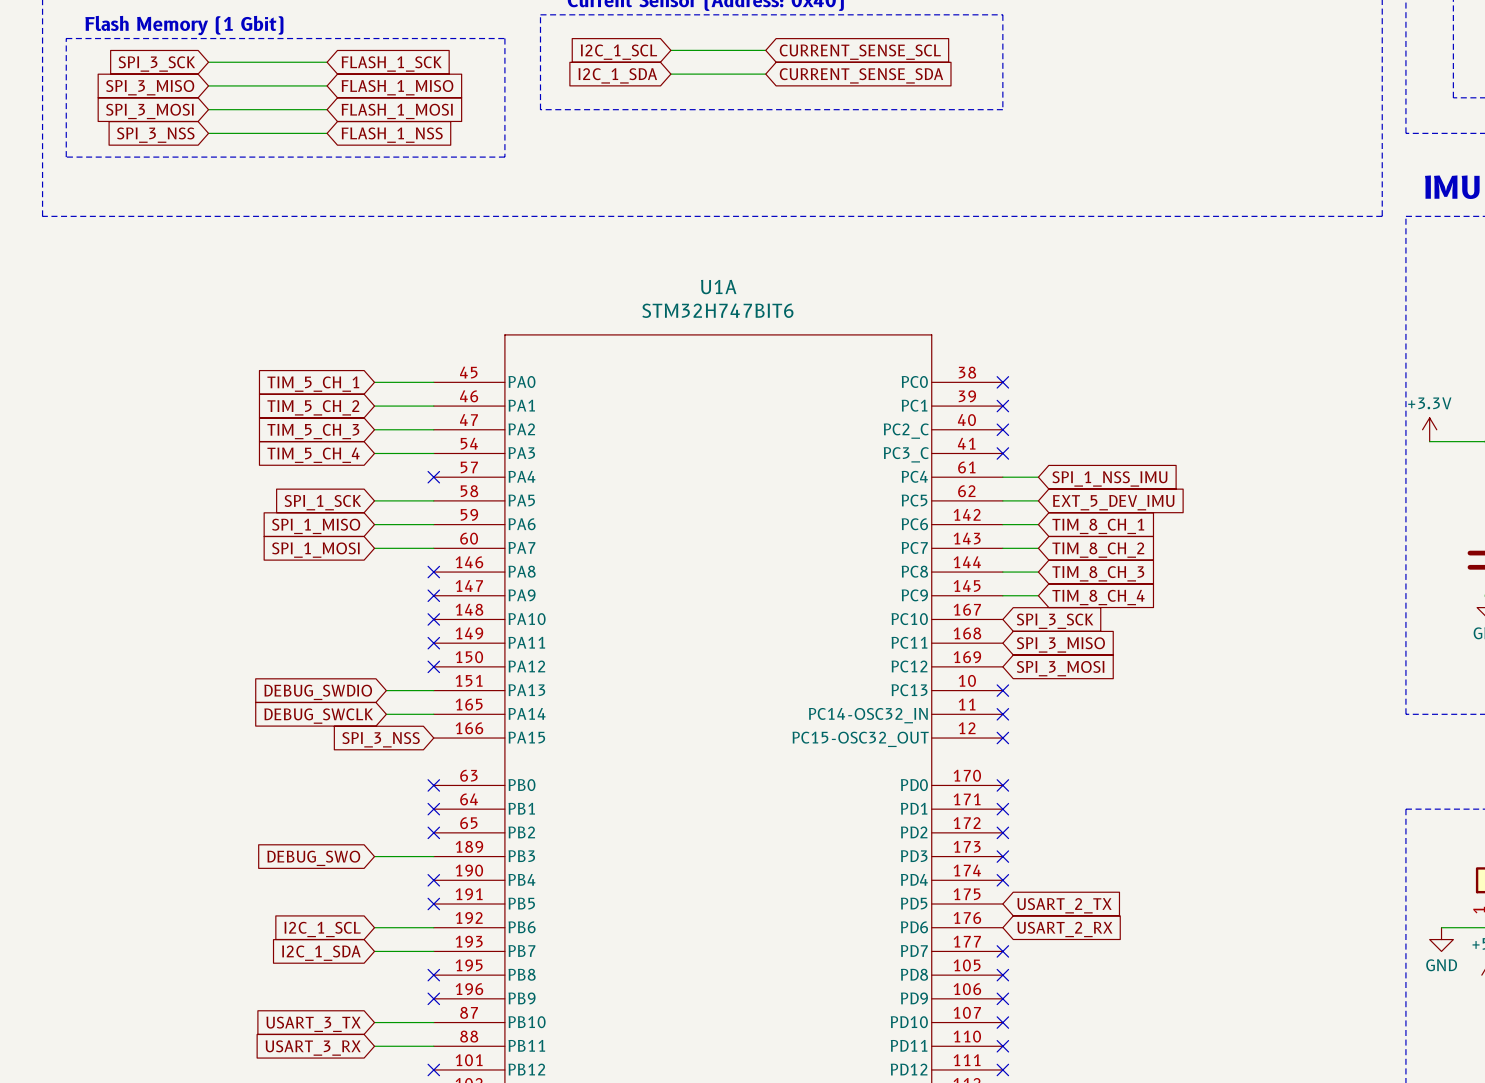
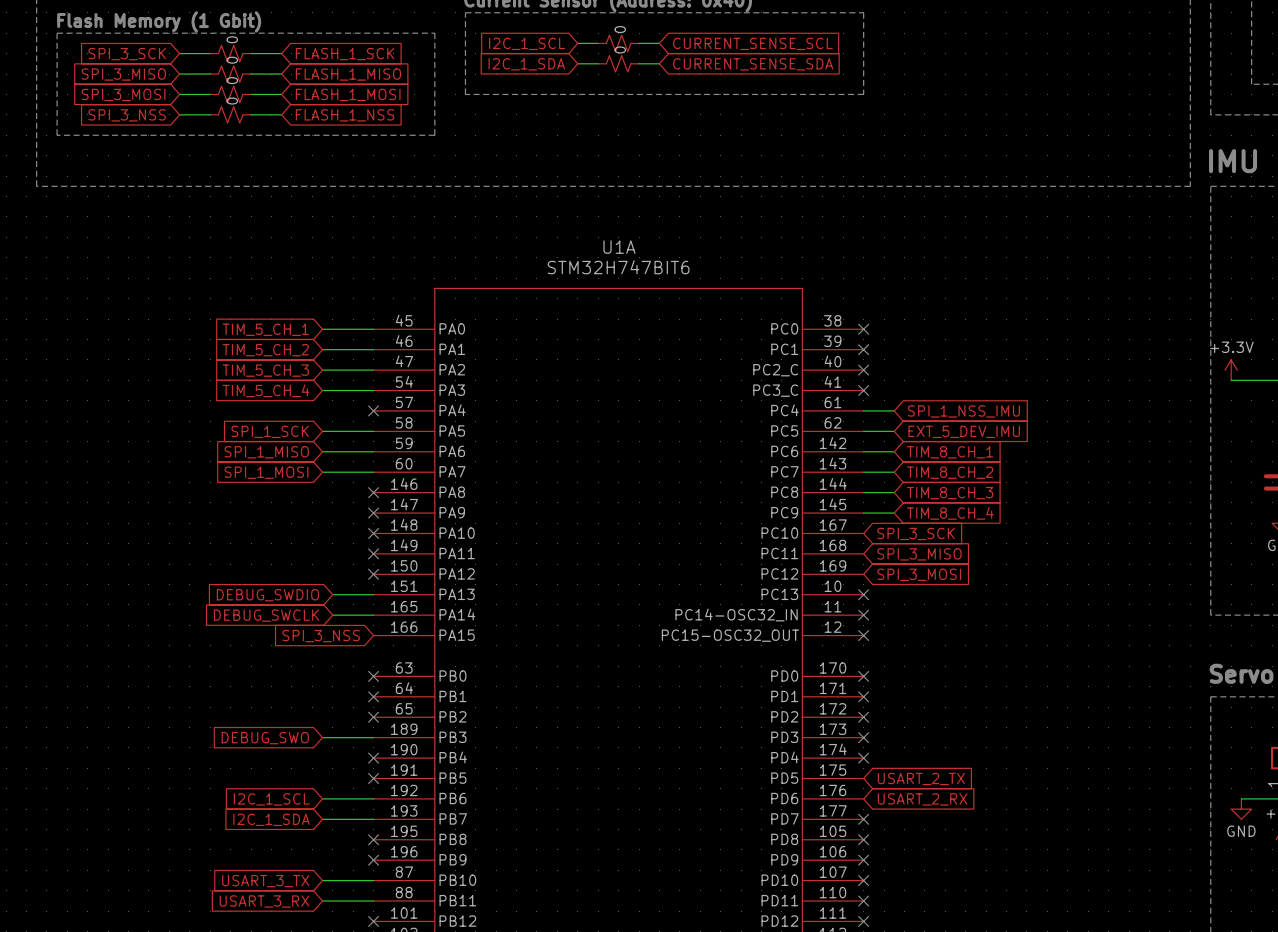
part: none -> 0 (618, 43)
part: none -> 0 (230, 53)
part: none -> 0 (618, 63)
part: none -> 0 (230, 74)
part: none -> 0 (230, 94)
part: none -> 0 (230, 114)

